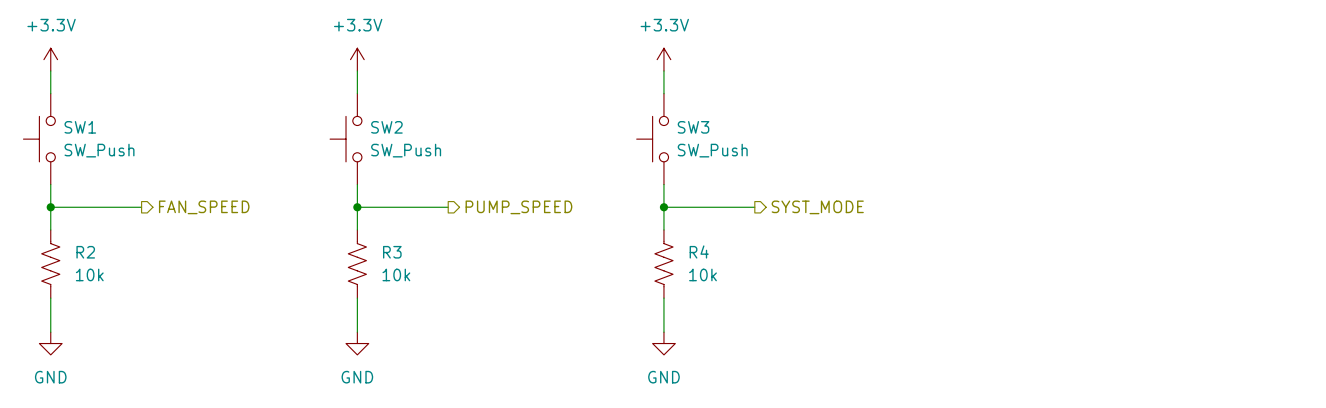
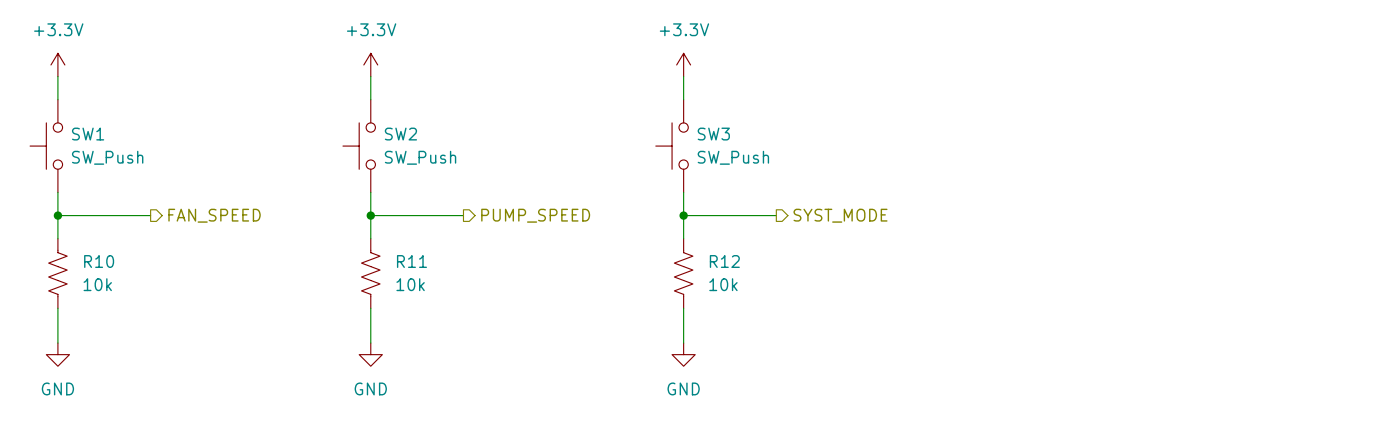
R4 name: R4 (699, 251) -> R12 (724, 261)
R2 name: R2 (85, 252) -> R10 (99, 261)
R3 name: R3 (392, 252) -> R11 (411, 261)

